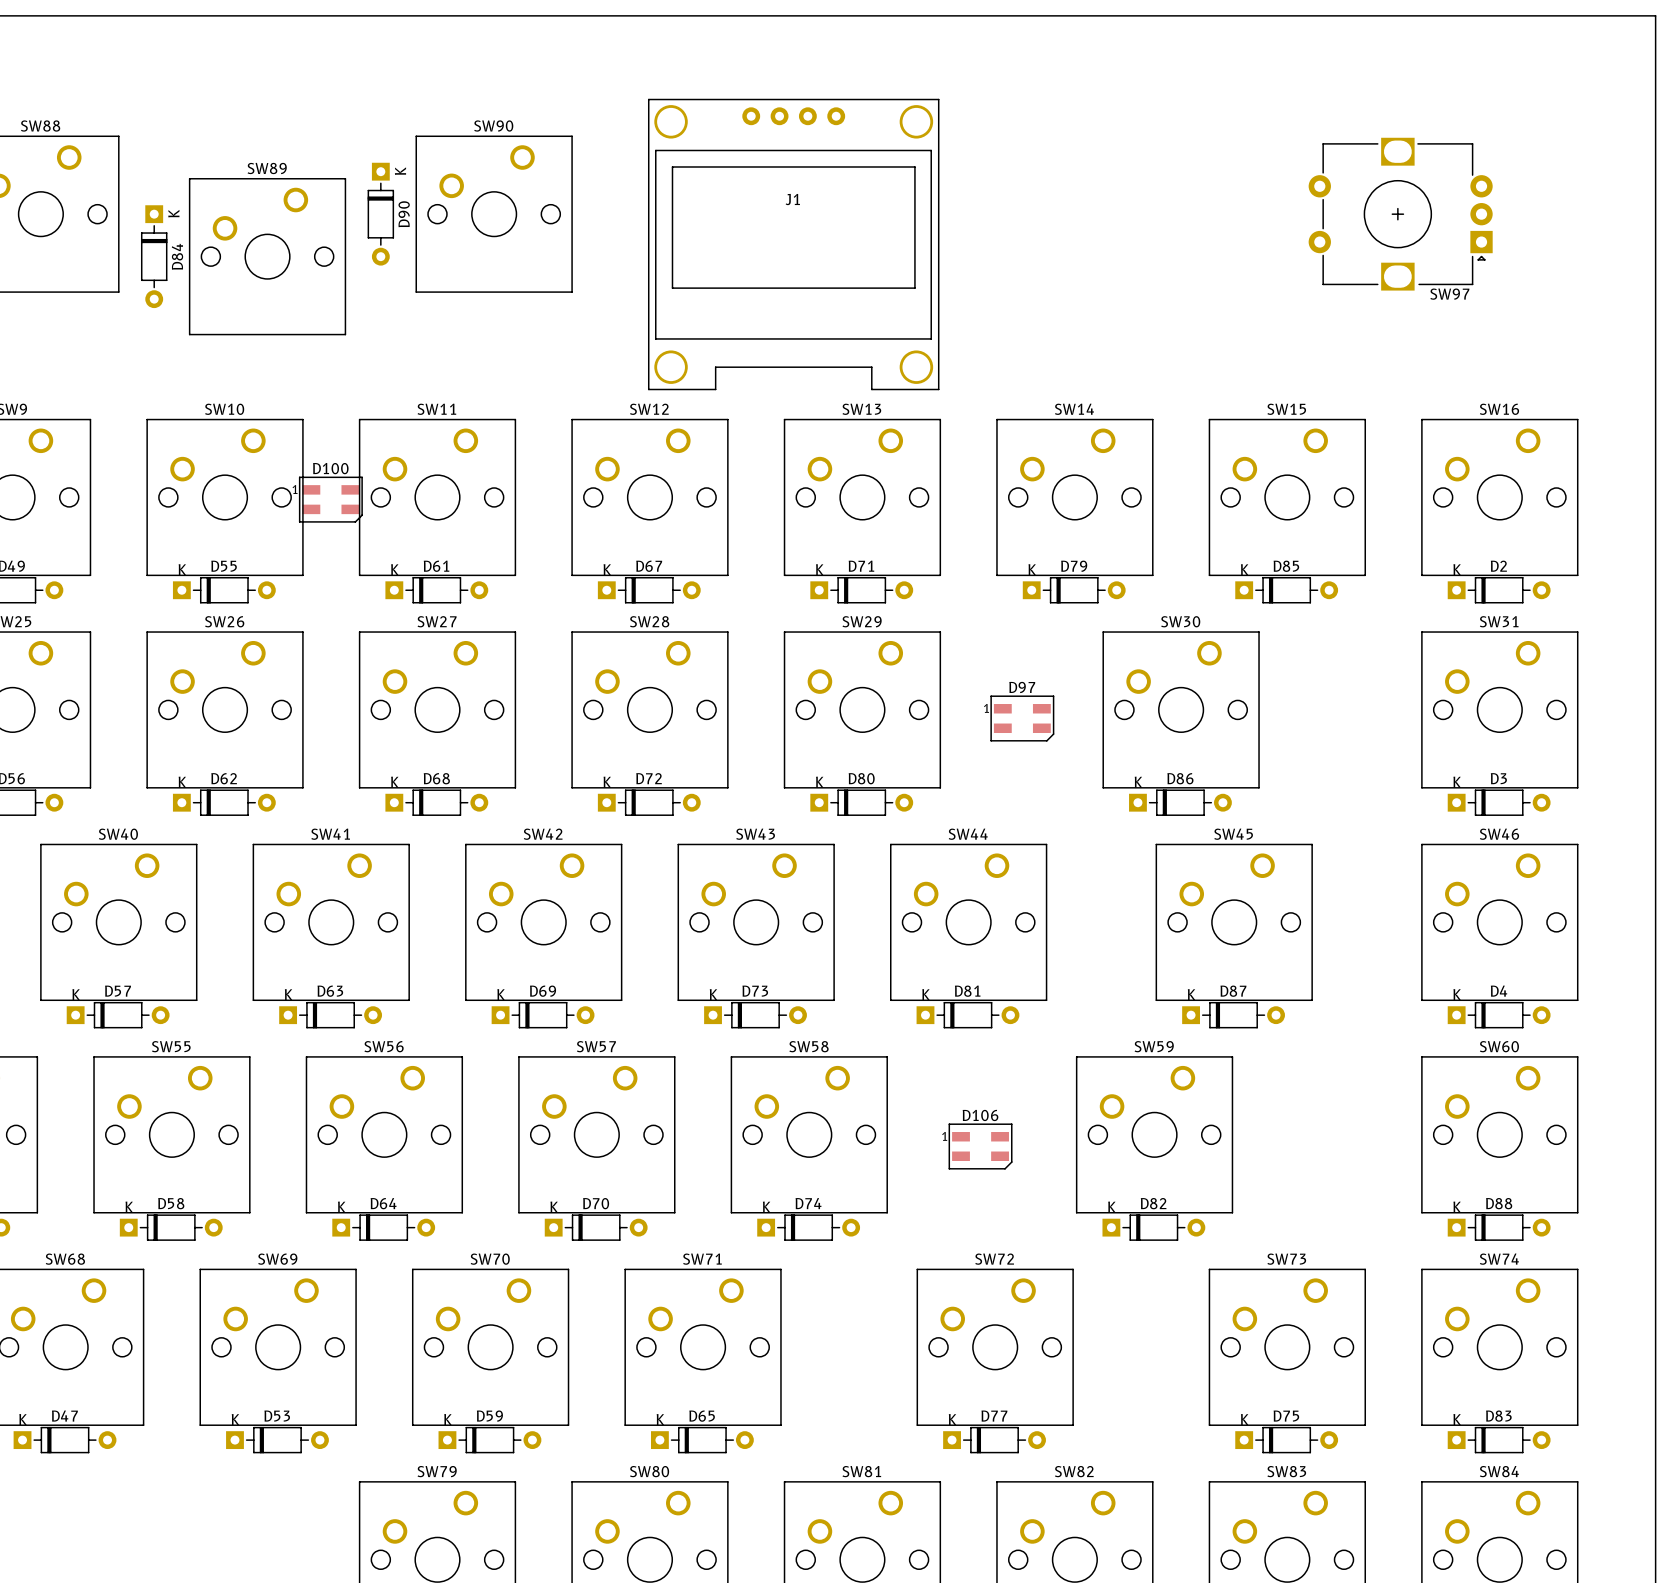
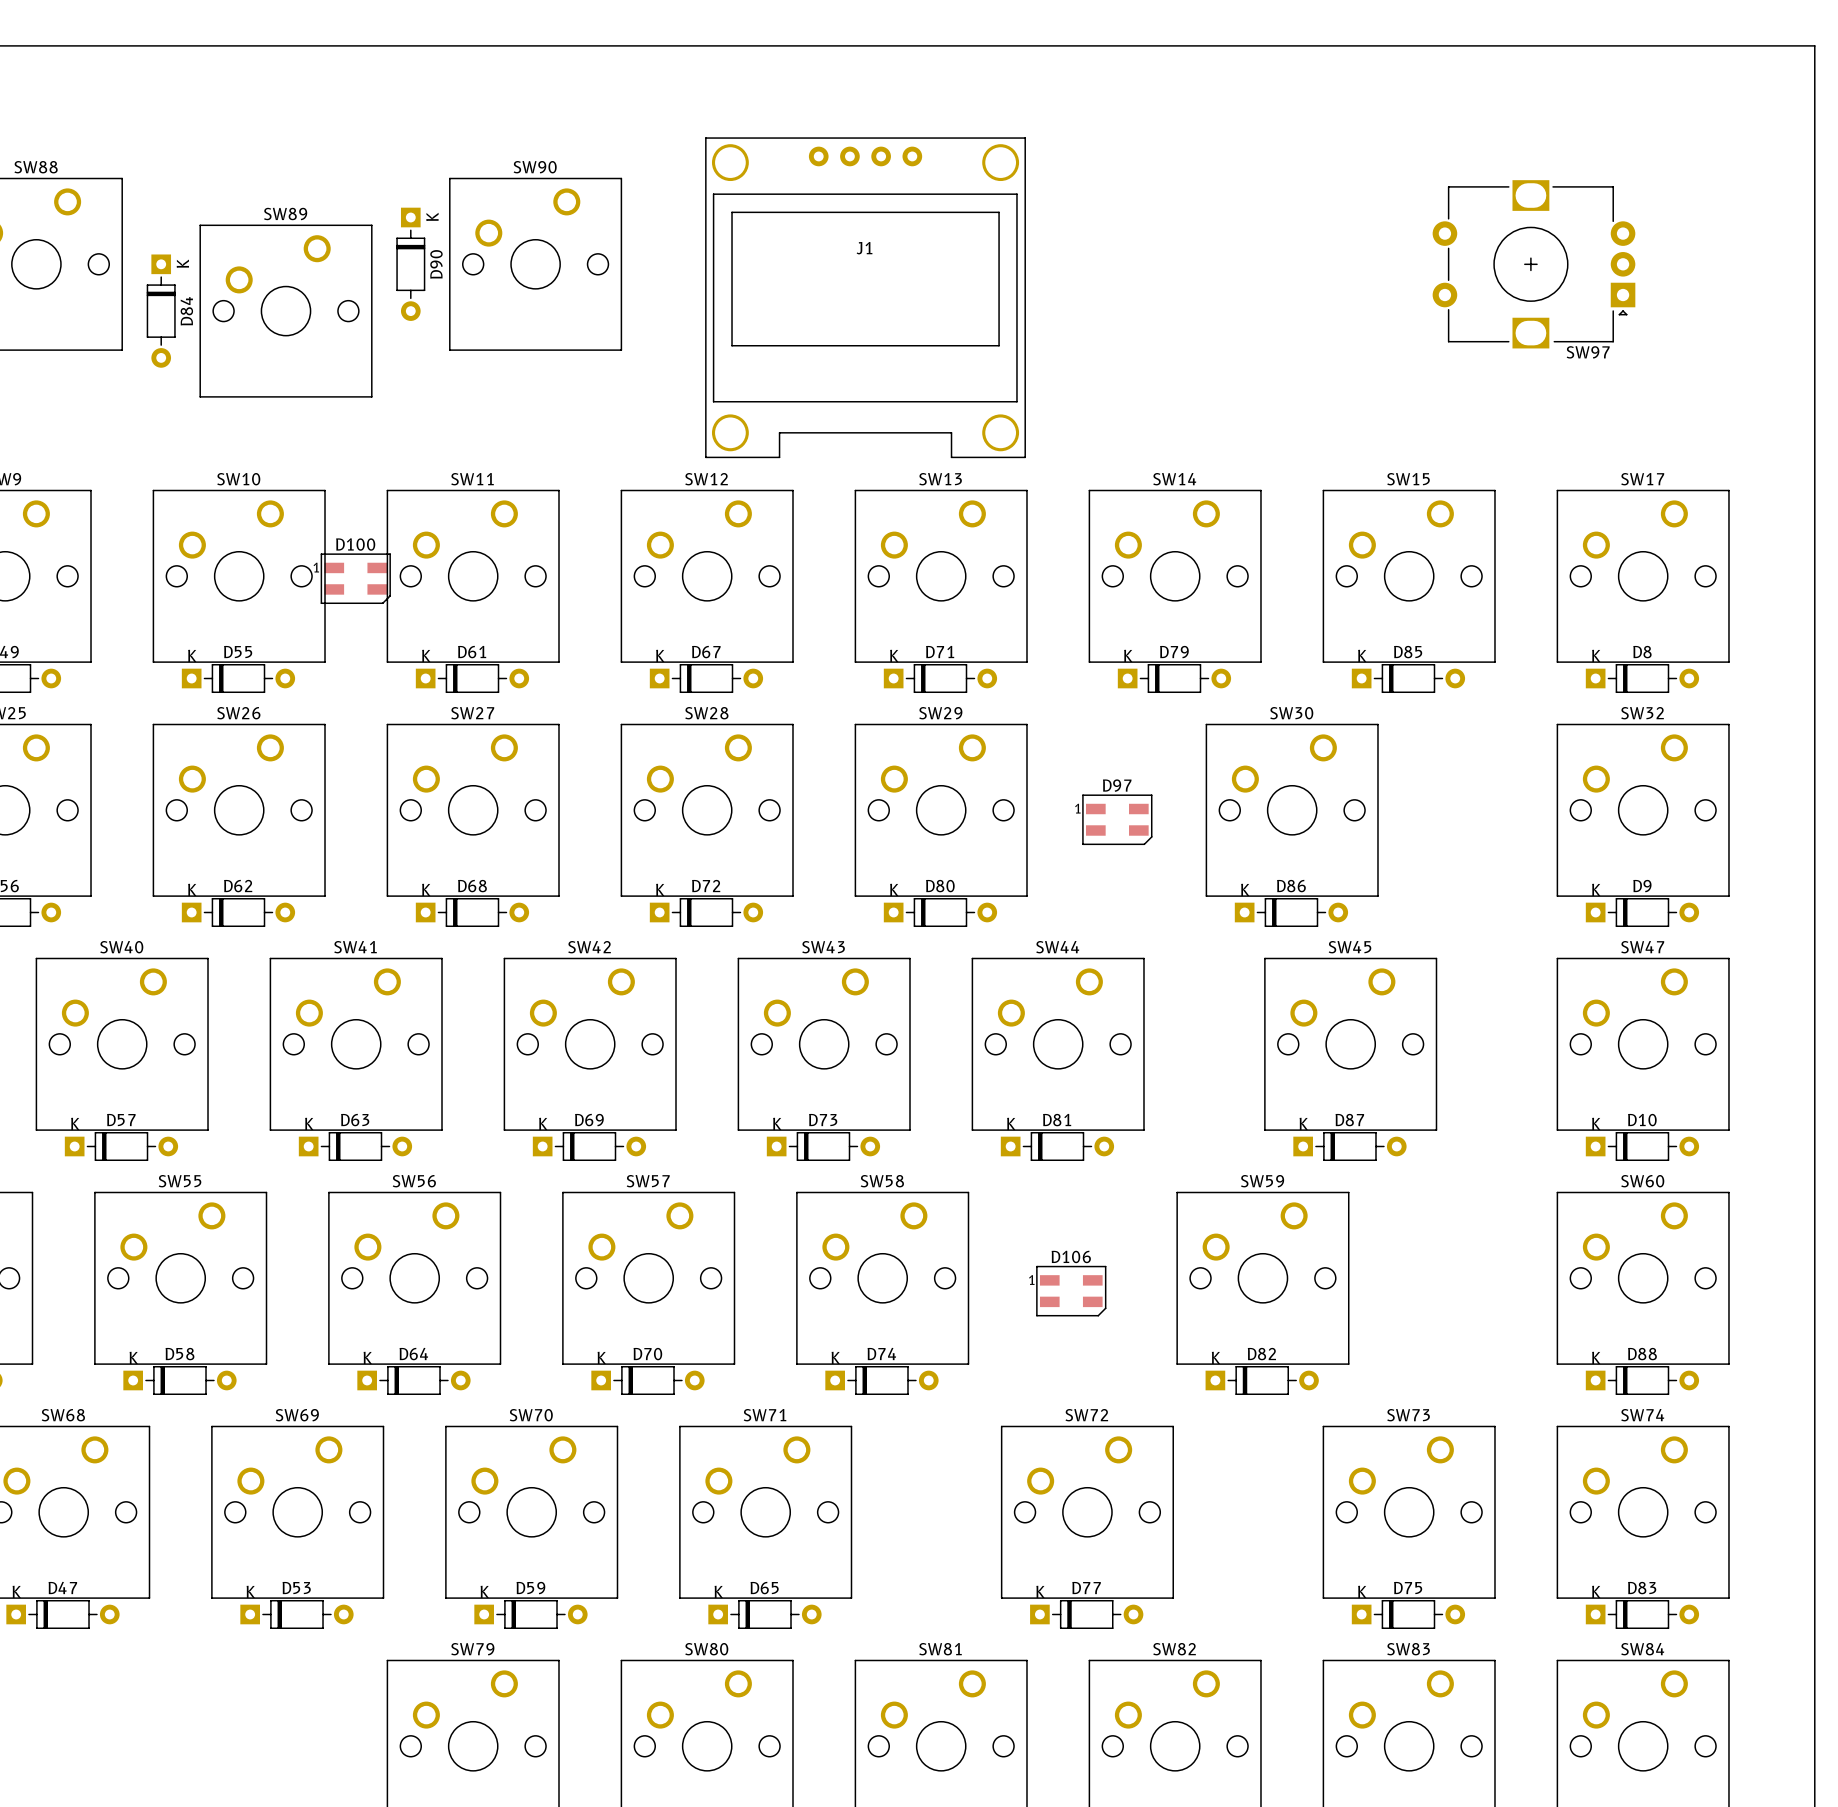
SW16 name: SW16 (1499, 409) -> SW17 (1642, 479)
D2 name: D2 (1498, 566) -> D8 (1642, 652)
SW31 name: SW31 (1499, 621) -> SW32 (1642, 713)
D3 name: D3 (1498, 778) -> D9 (1642, 886)
SW46 name: SW46 (1499, 834) -> SW47 (1642, 947)
D4 name: D4 (1499, 991) -> D10 (1642, 1120)

